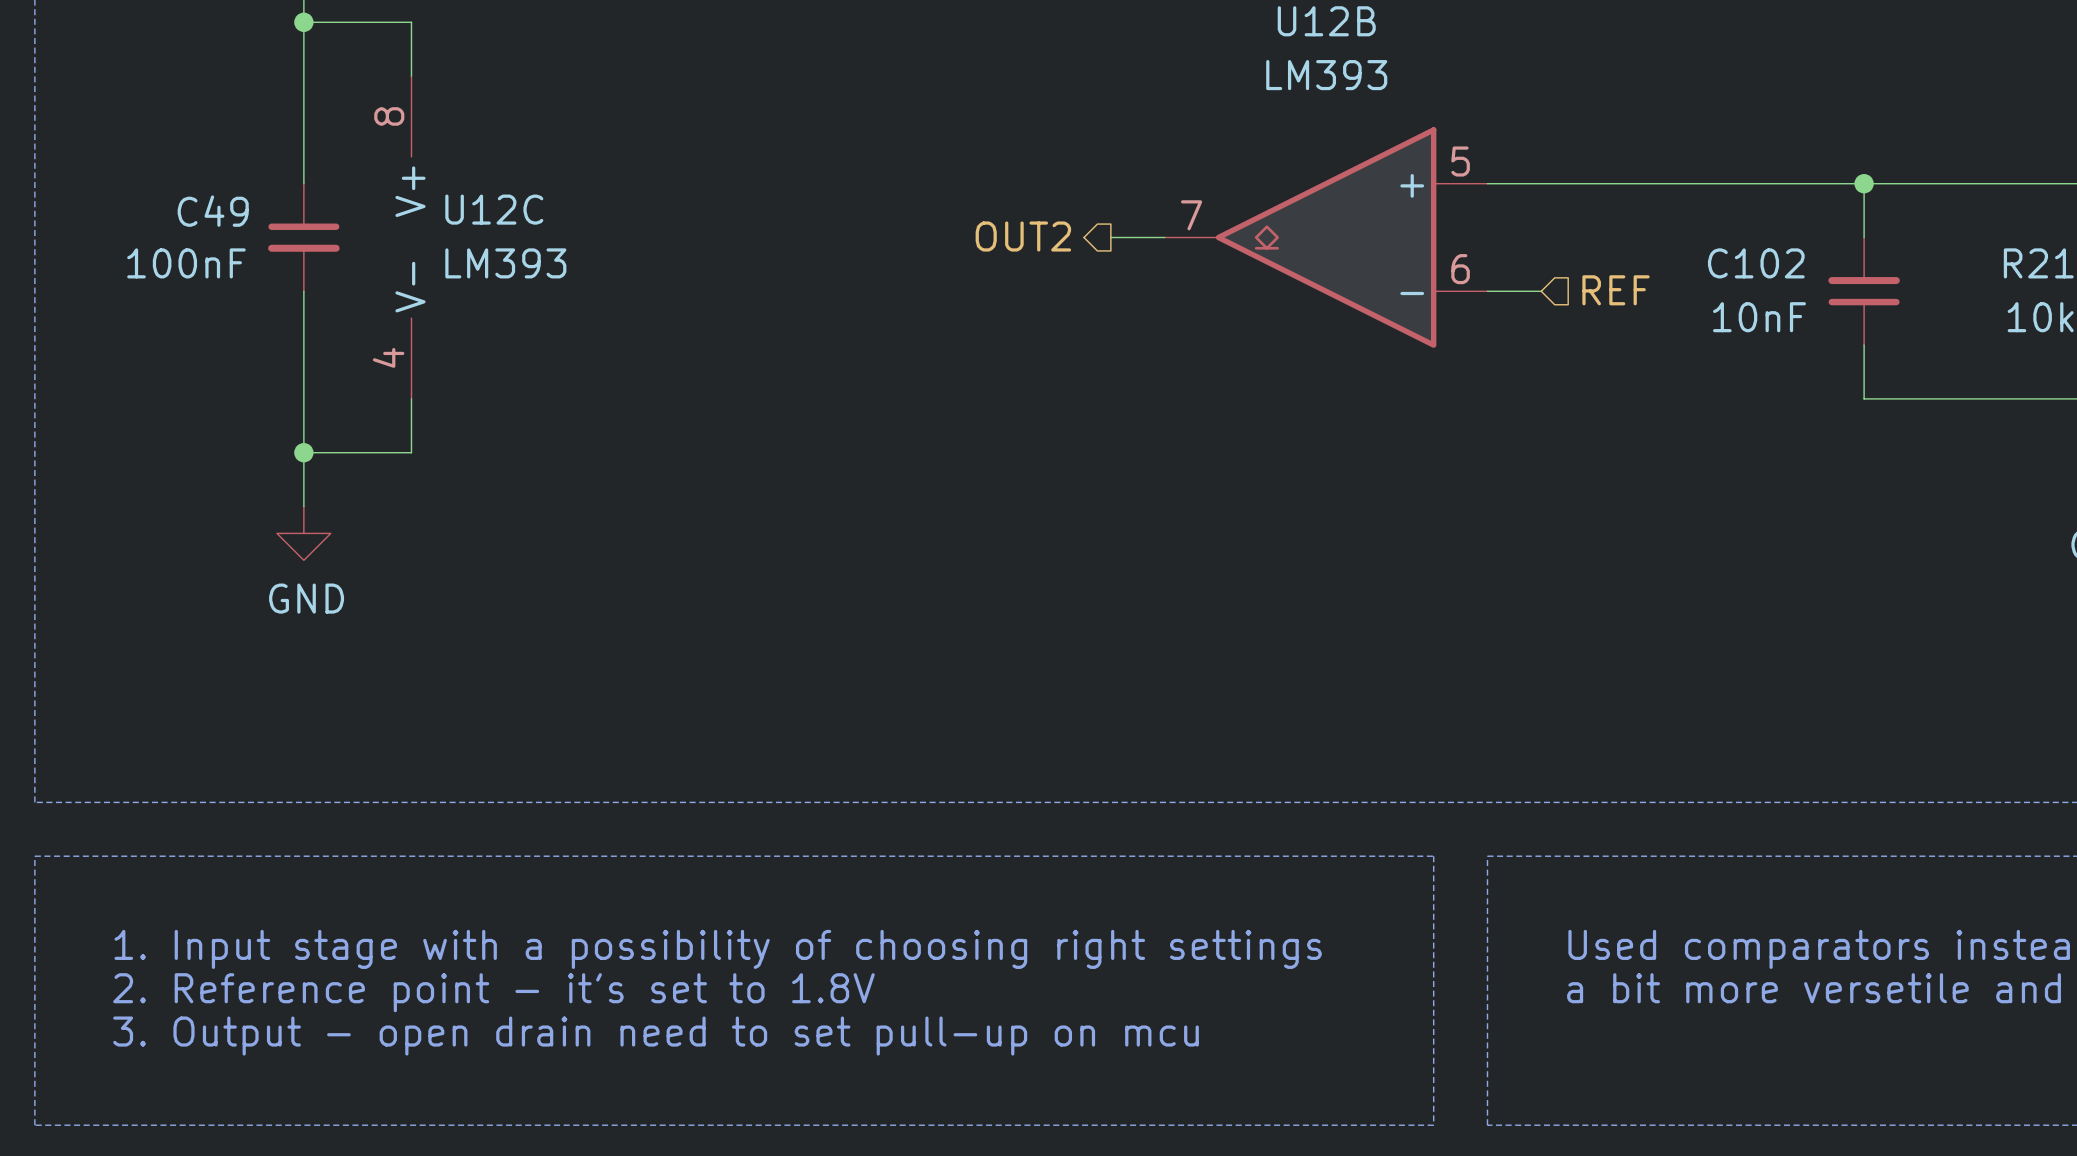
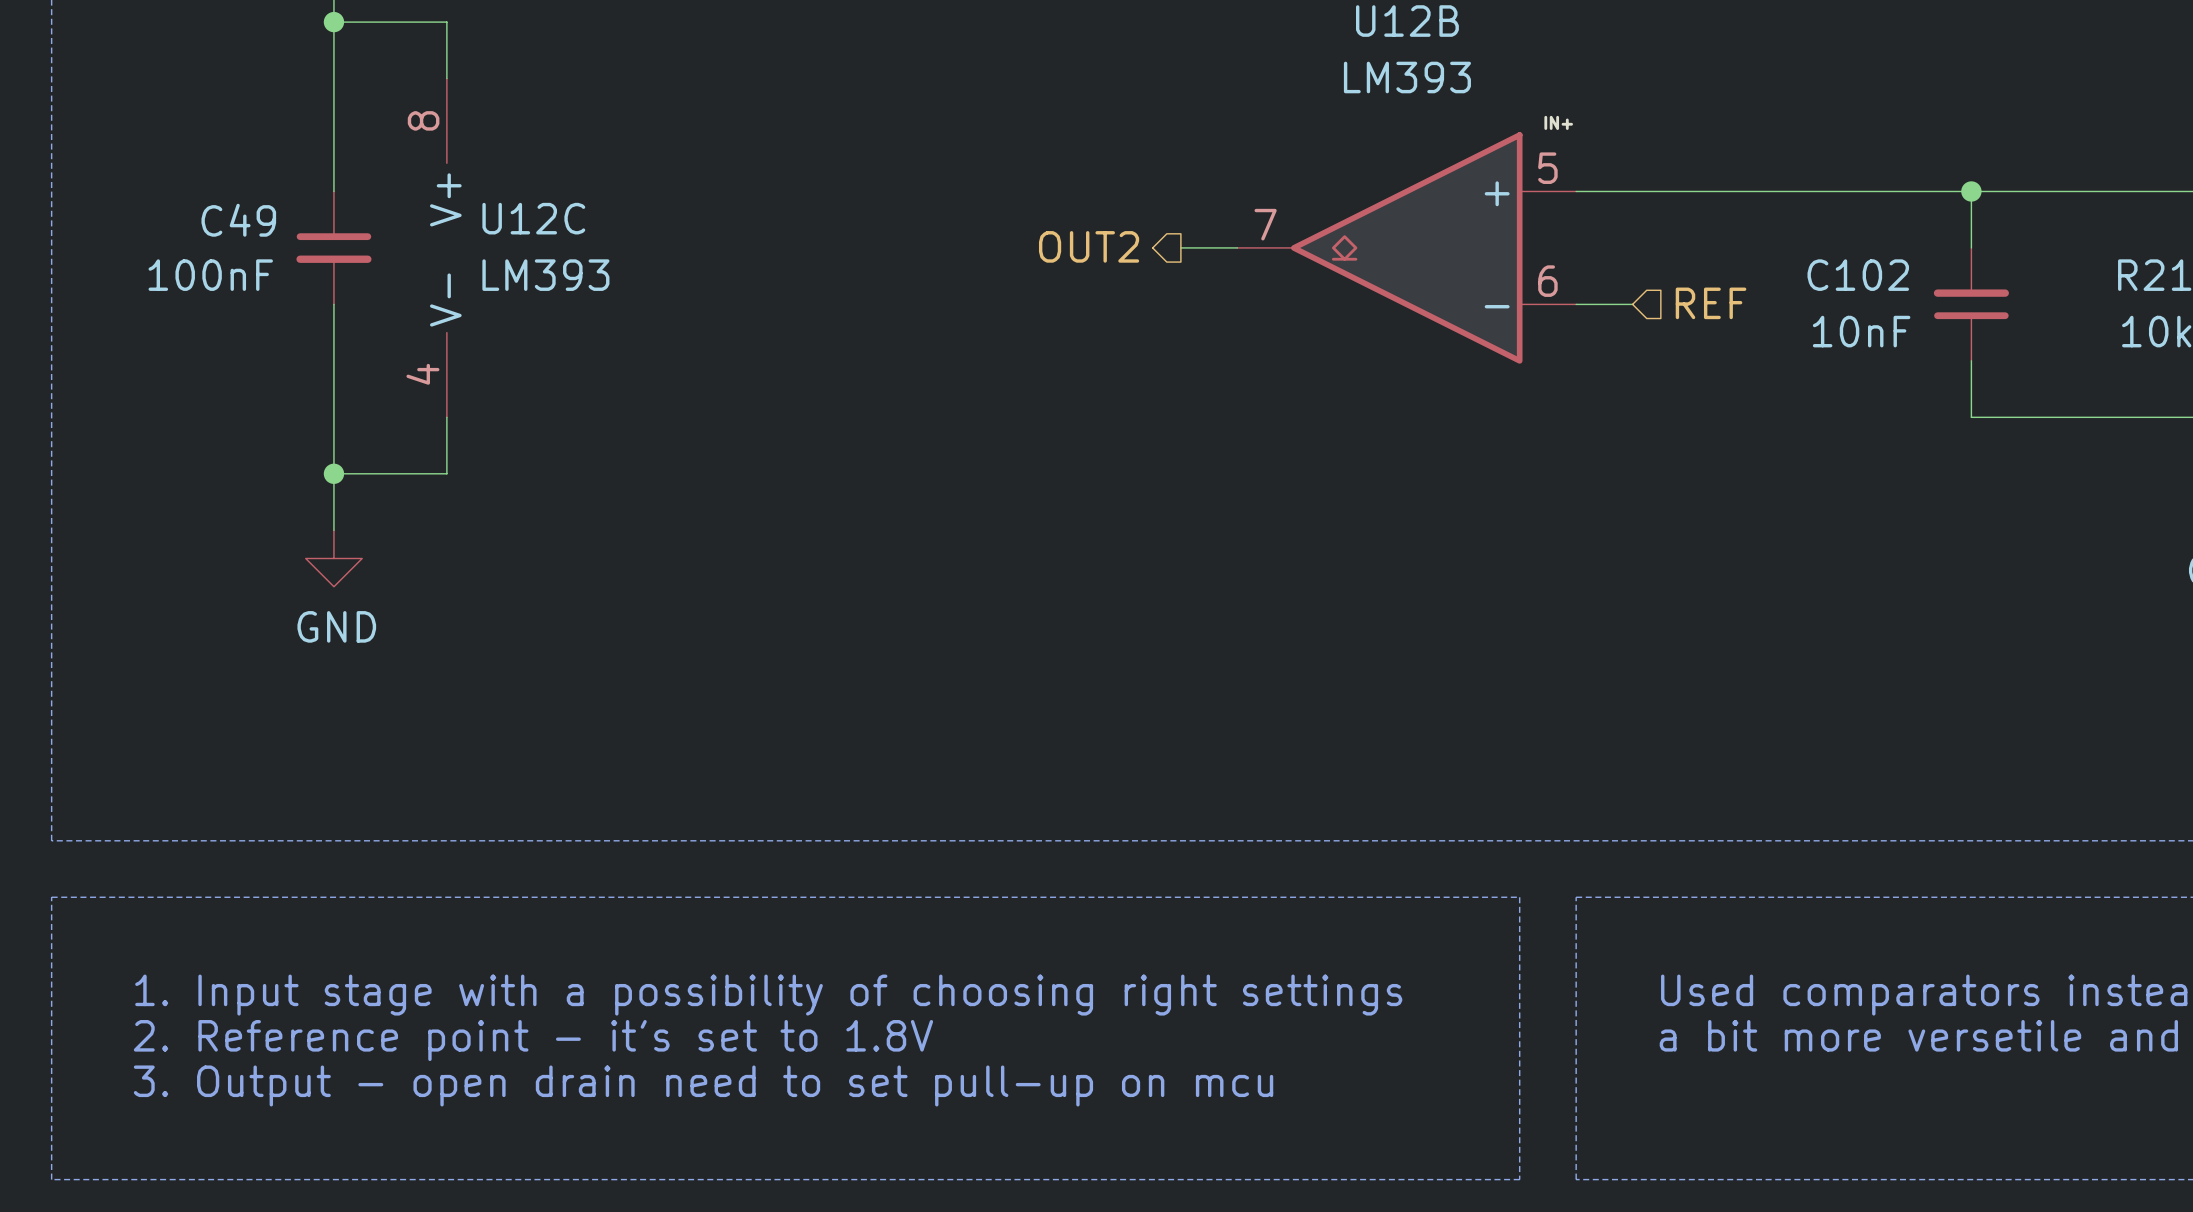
label: none -> IN+ (1558, 122)

